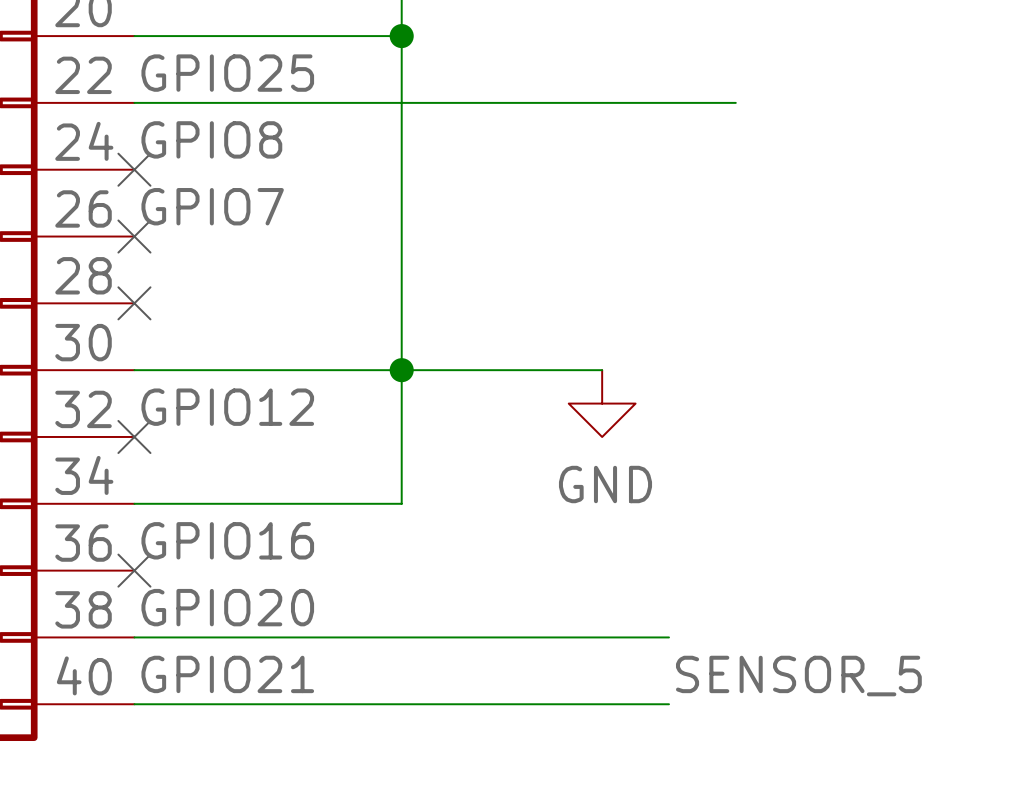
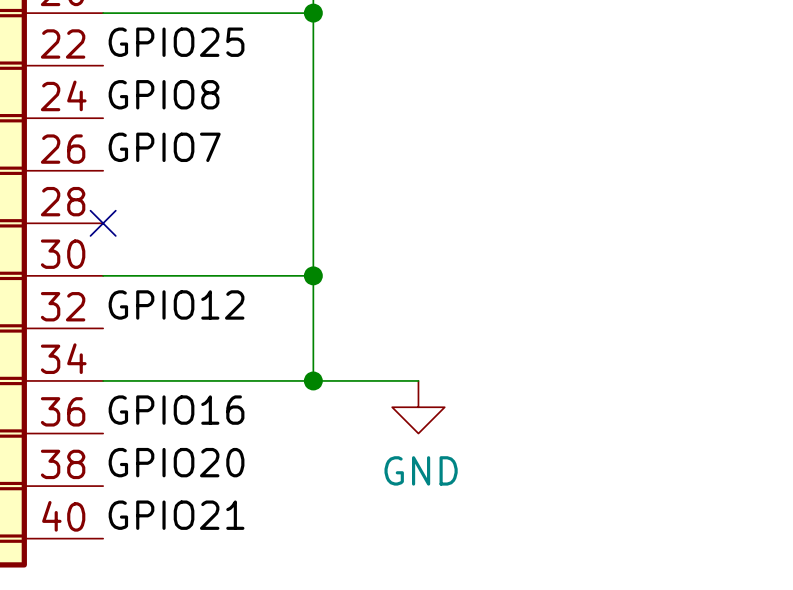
wire: (134, 102) (735, 102) -> none
no-connect mark: (134, 169) -> none
no-connect mark: (134, 236) -> none
wire: (401, 370) (602, 370) -> none
power symbol position: GND (602, 403) -> GND (418, 407)
no-connect mark: (134, 436) -> none
wire: none -> (313, 380) (418, 380)
junction: none -> (313, 380)
no-connect mark: (134, 570) -> none
wire: (134, 637) (668, 637) -> none
label: SENSOR_5 (798, 676) -> none
wire: (134, 704) (668, 704) -> none

